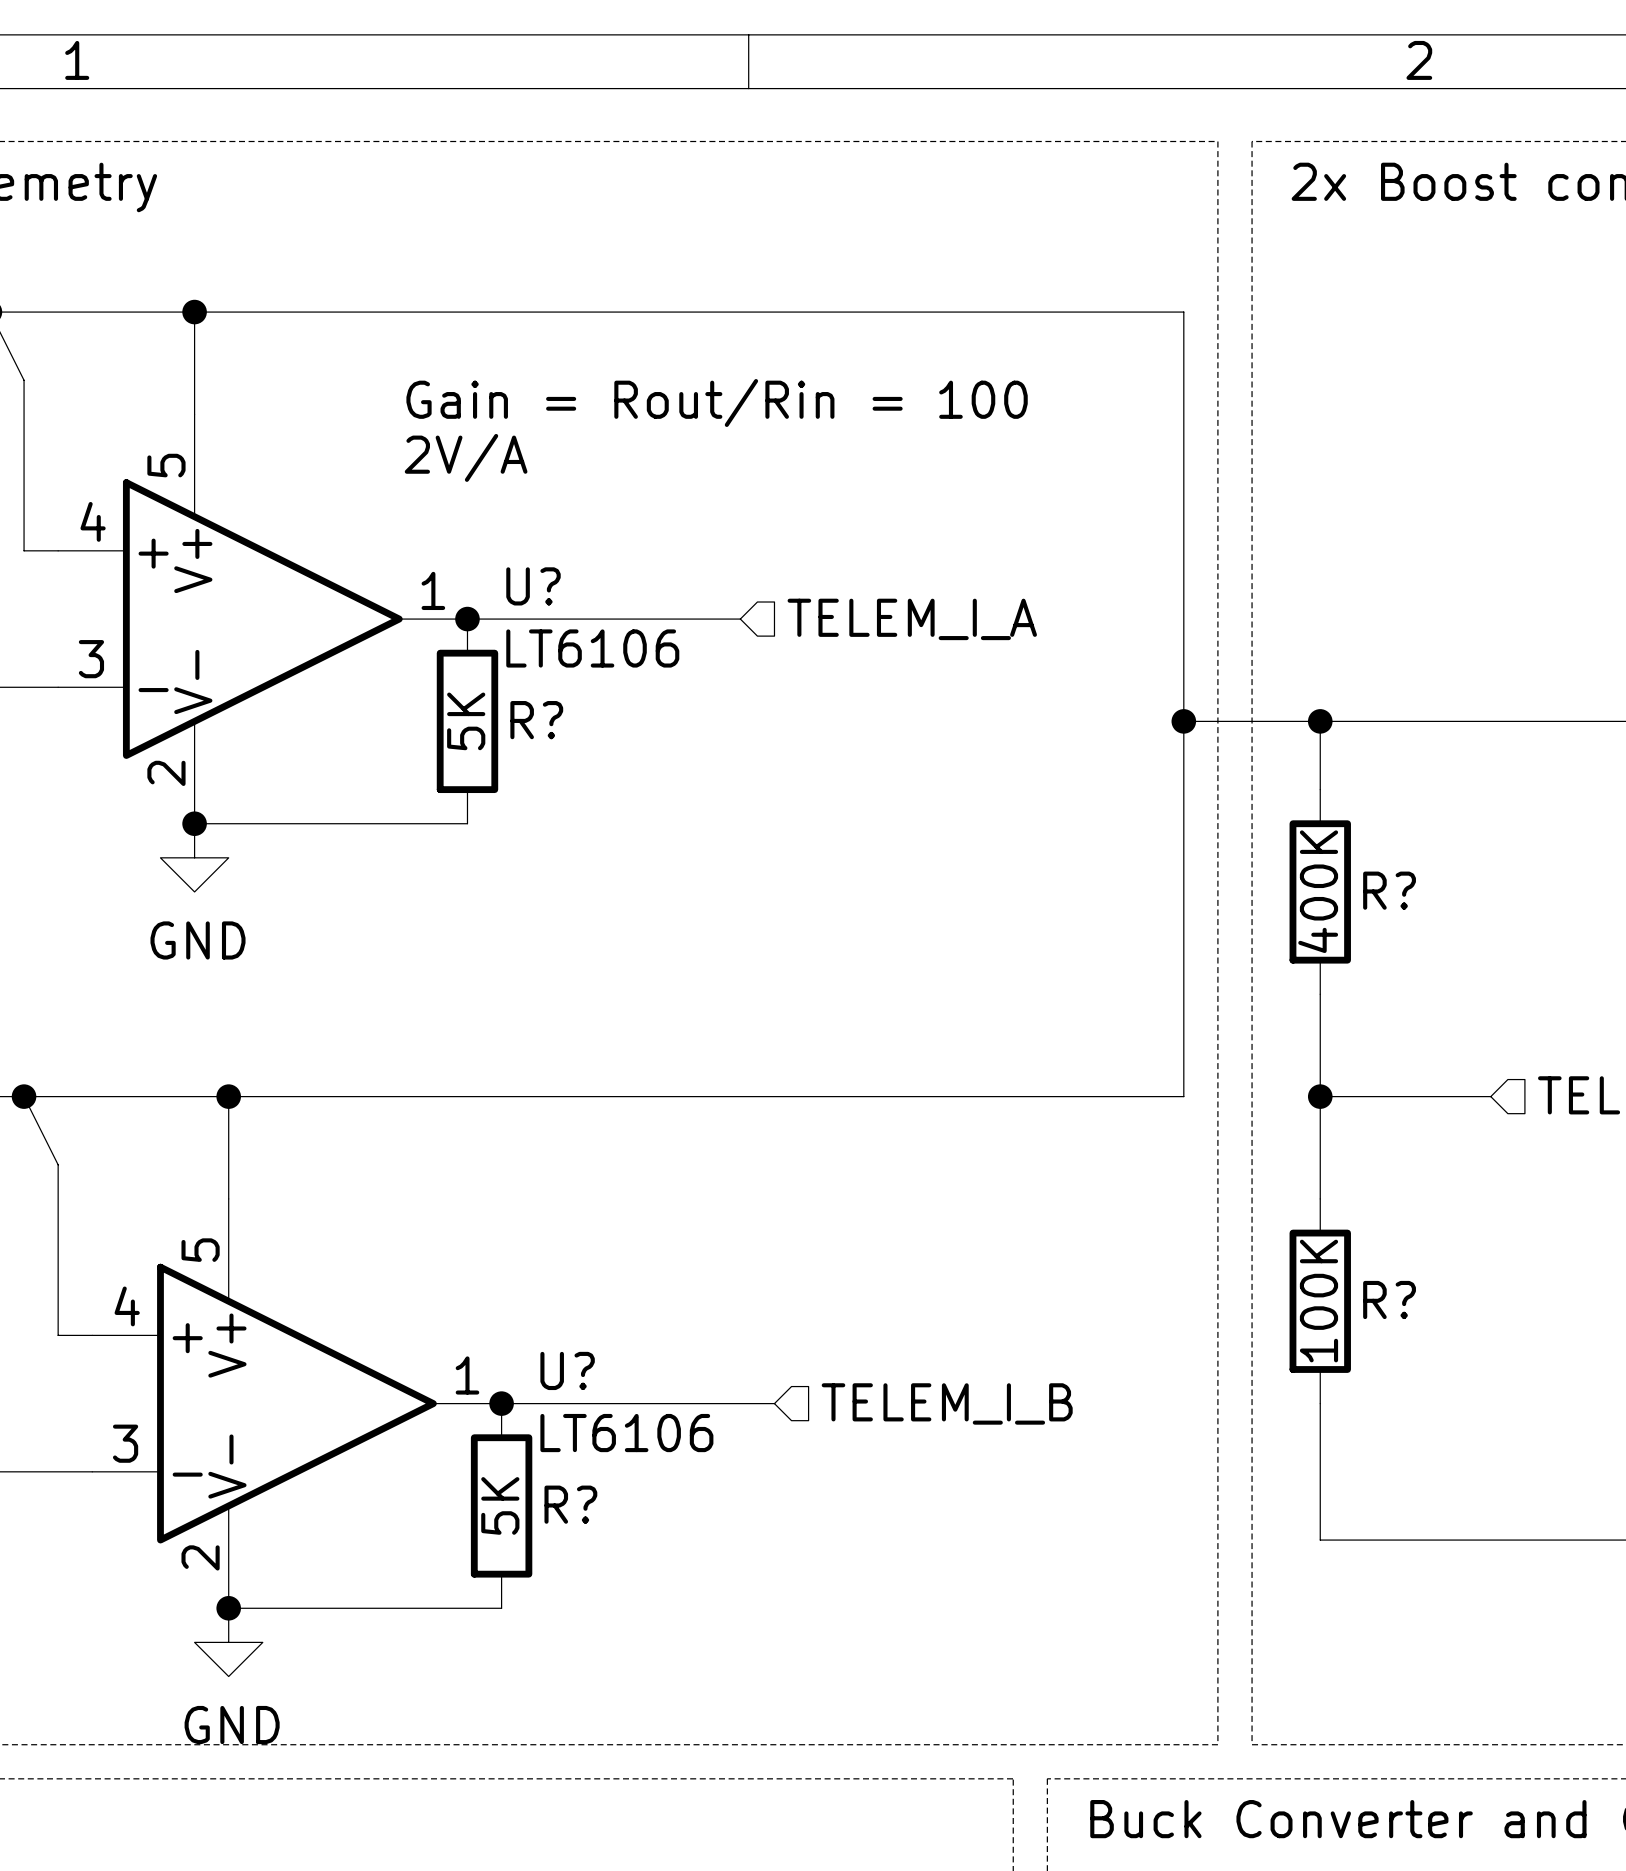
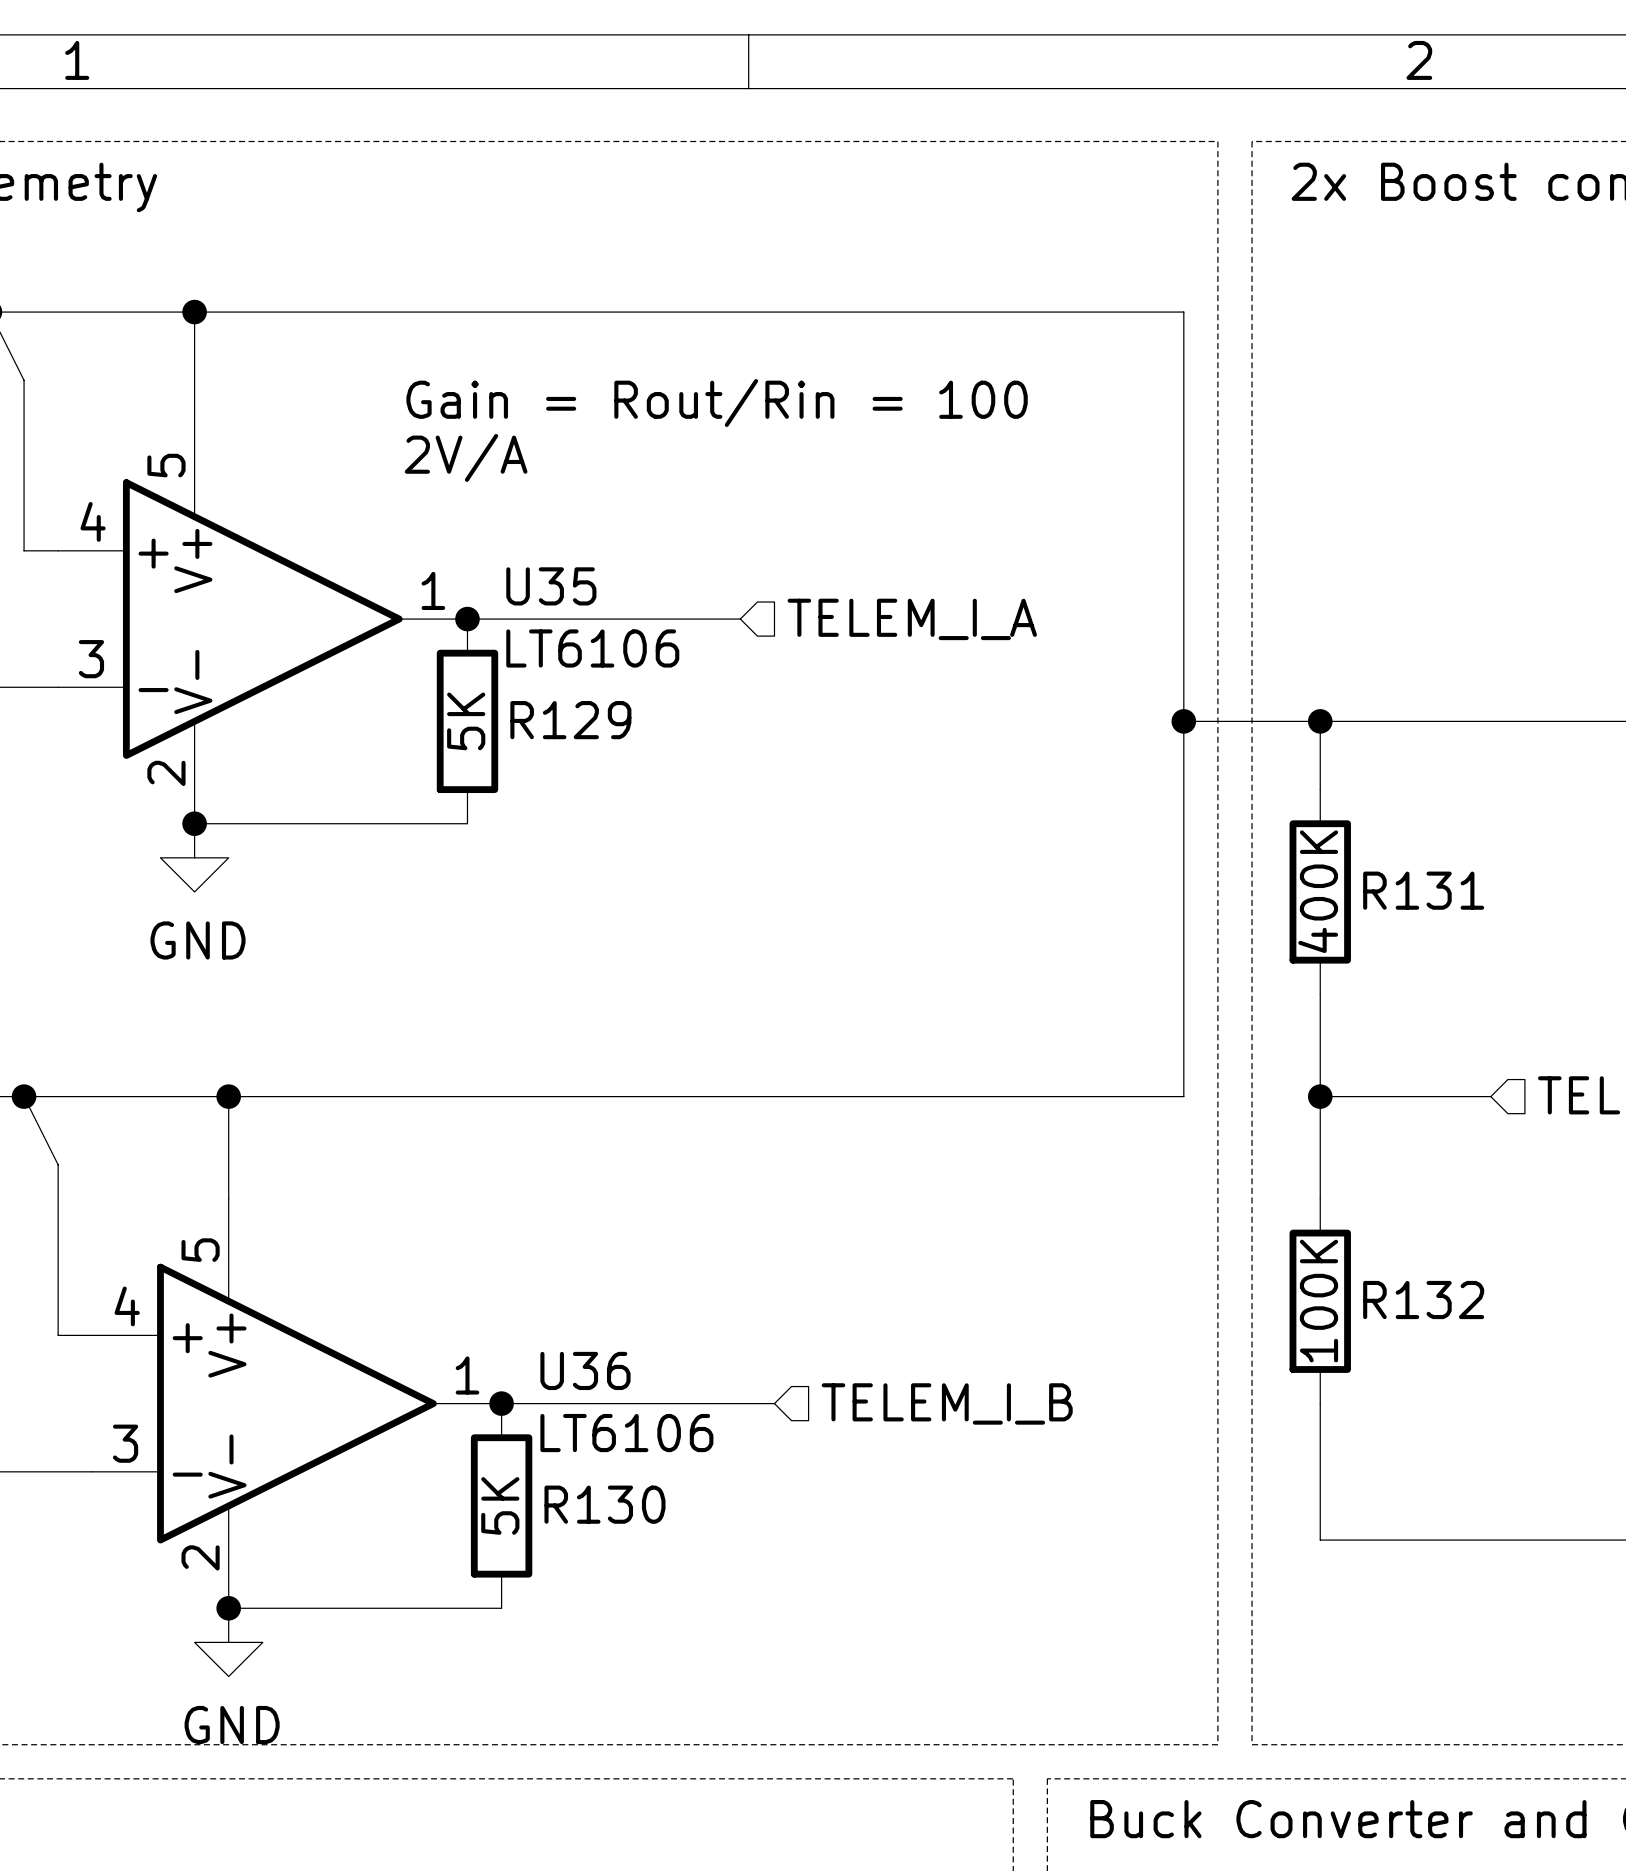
U? name: U? (533, 586) -> U35 (551, 586)
R? name: R? (536, 720) -> R129 (570, 720)
R? name: R? (1389, 890) -> R131 (1423, 890)
R? name: R? (1389, 1300) -> R132 (1423, 1300)
U? name: U? (567, 1370) -> U36 (585, 1370)
R? name: R? (570, 1504) -> R130 (604, 1504)

